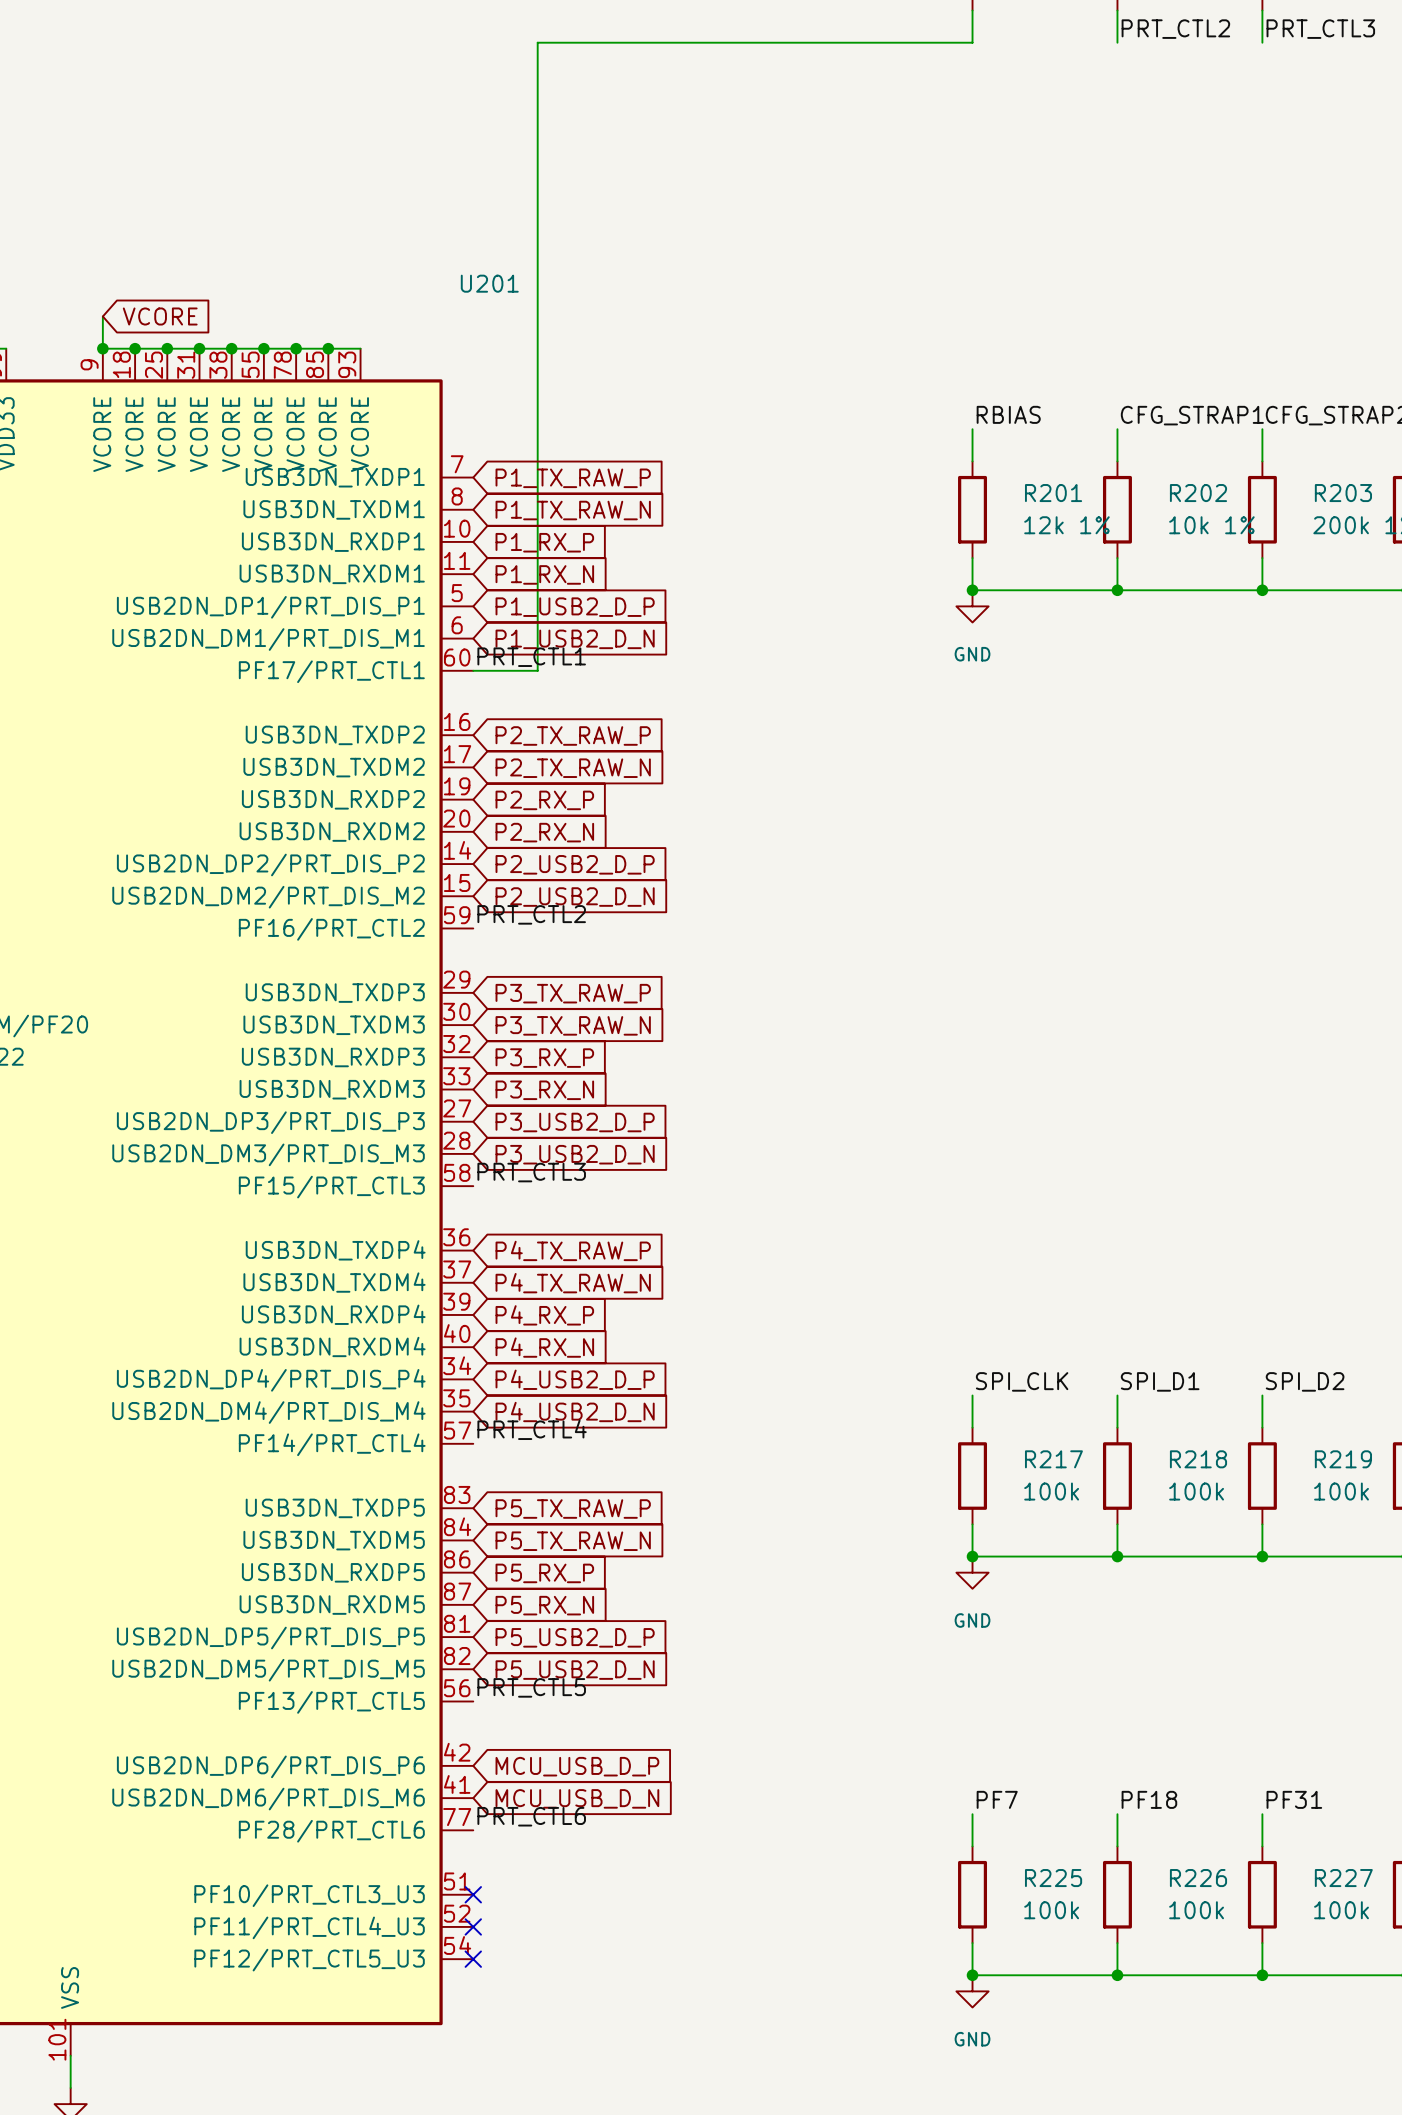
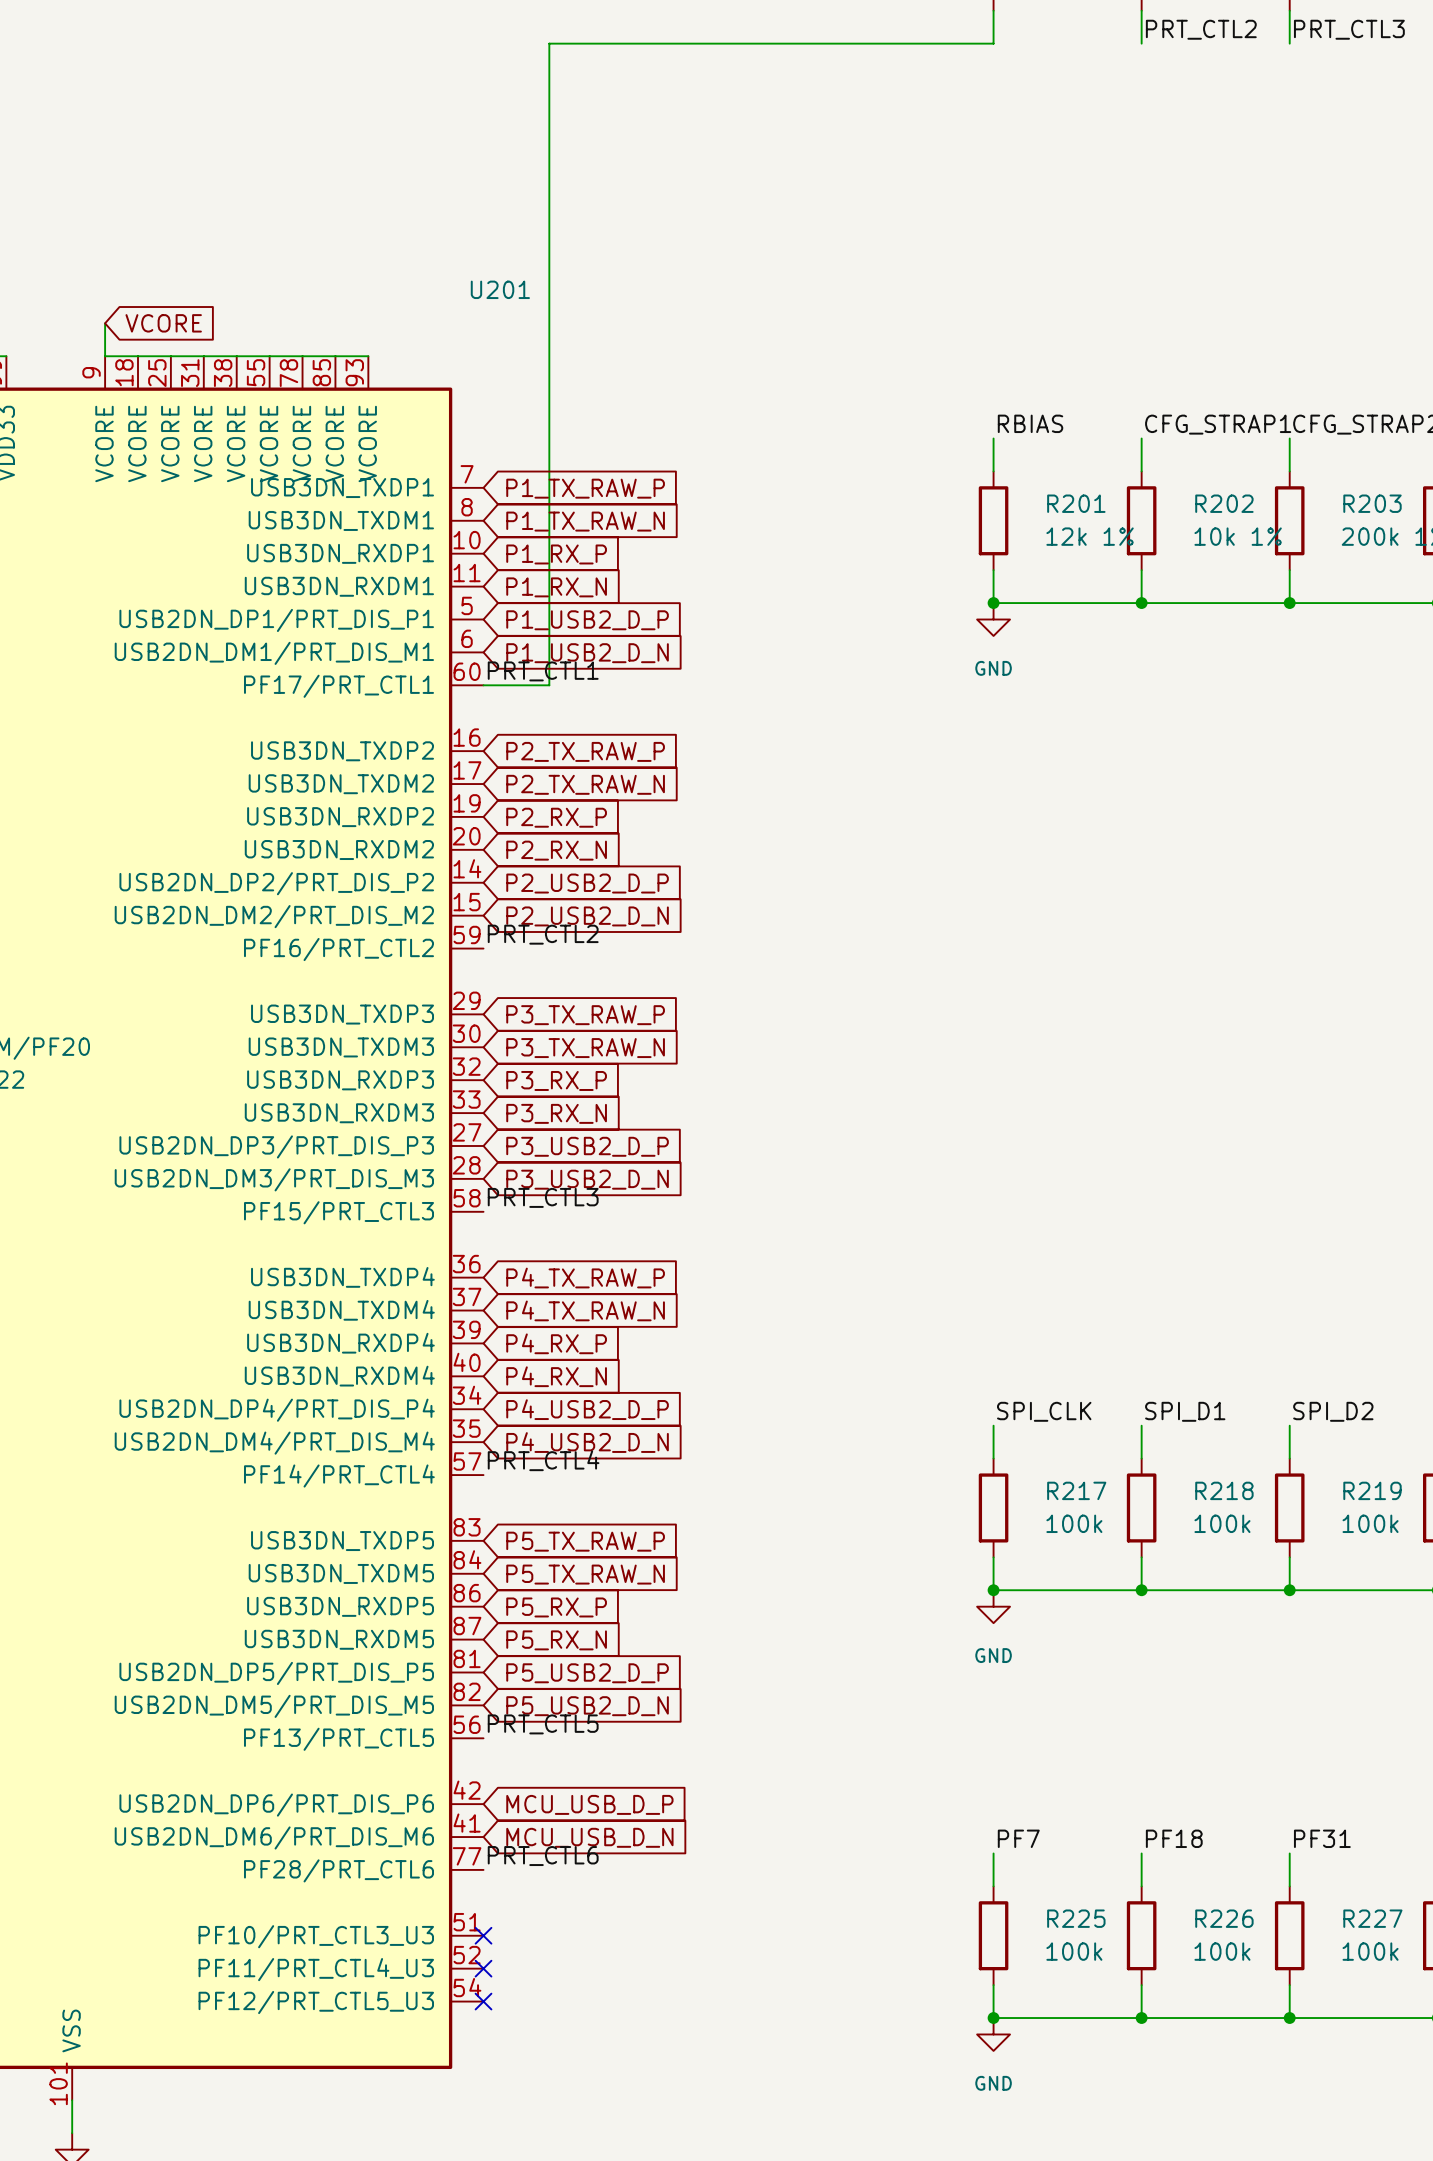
junction: (102, 348) -> none
junction: (135, 348) -> none
junction: (167, 348) -> none
junction: (199, 348) -> none
junction: (231, 348) -> none
junction: (263, 348) -> none
junction: (296, 348) -> none
junction: (328, 348) -> none

